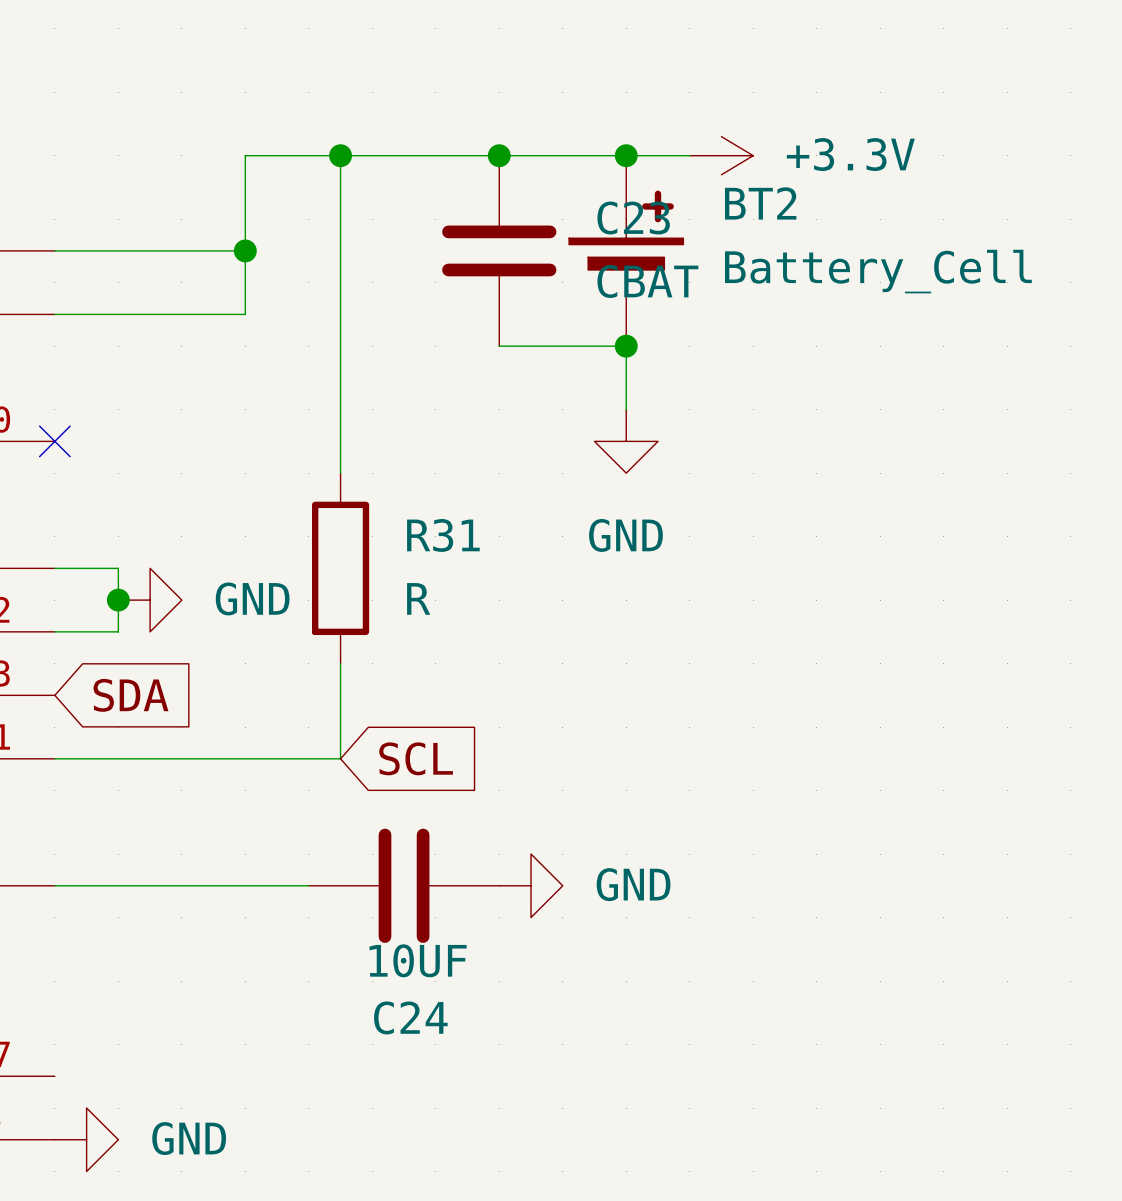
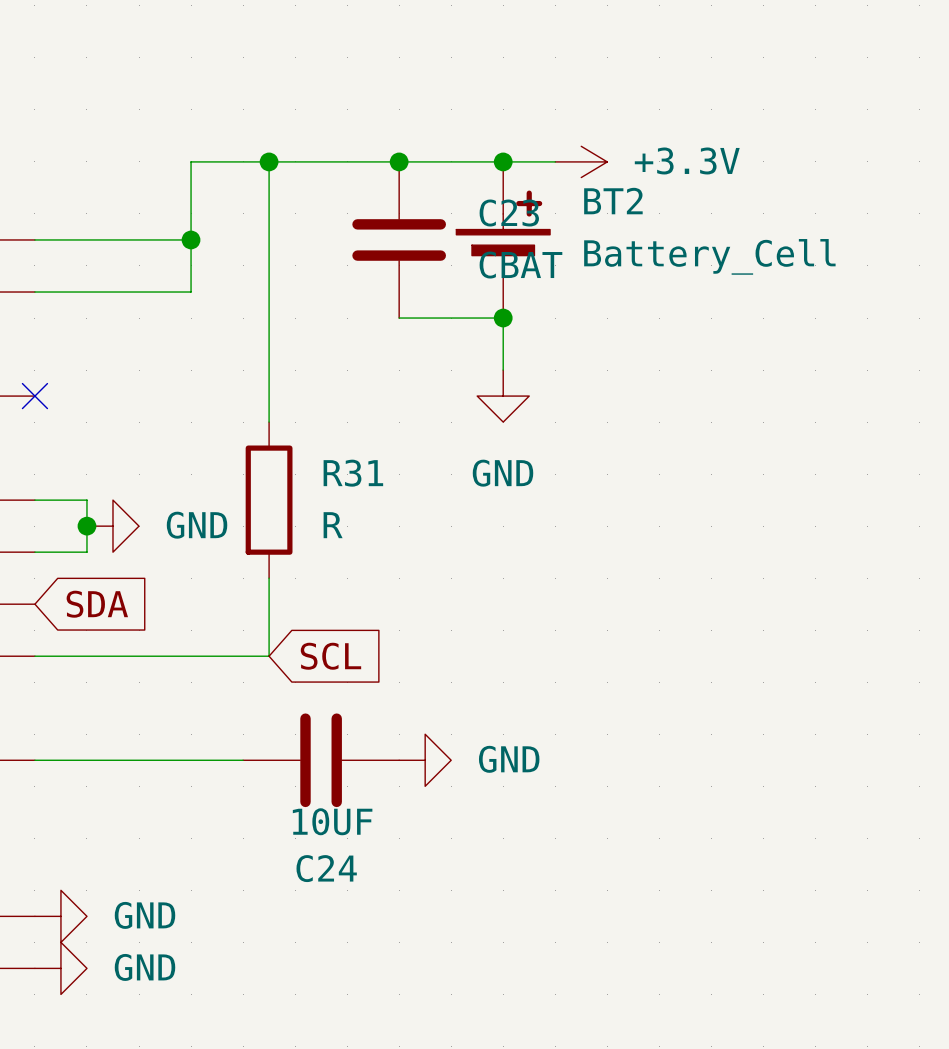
power symbol: none -> GND (60, 916)

